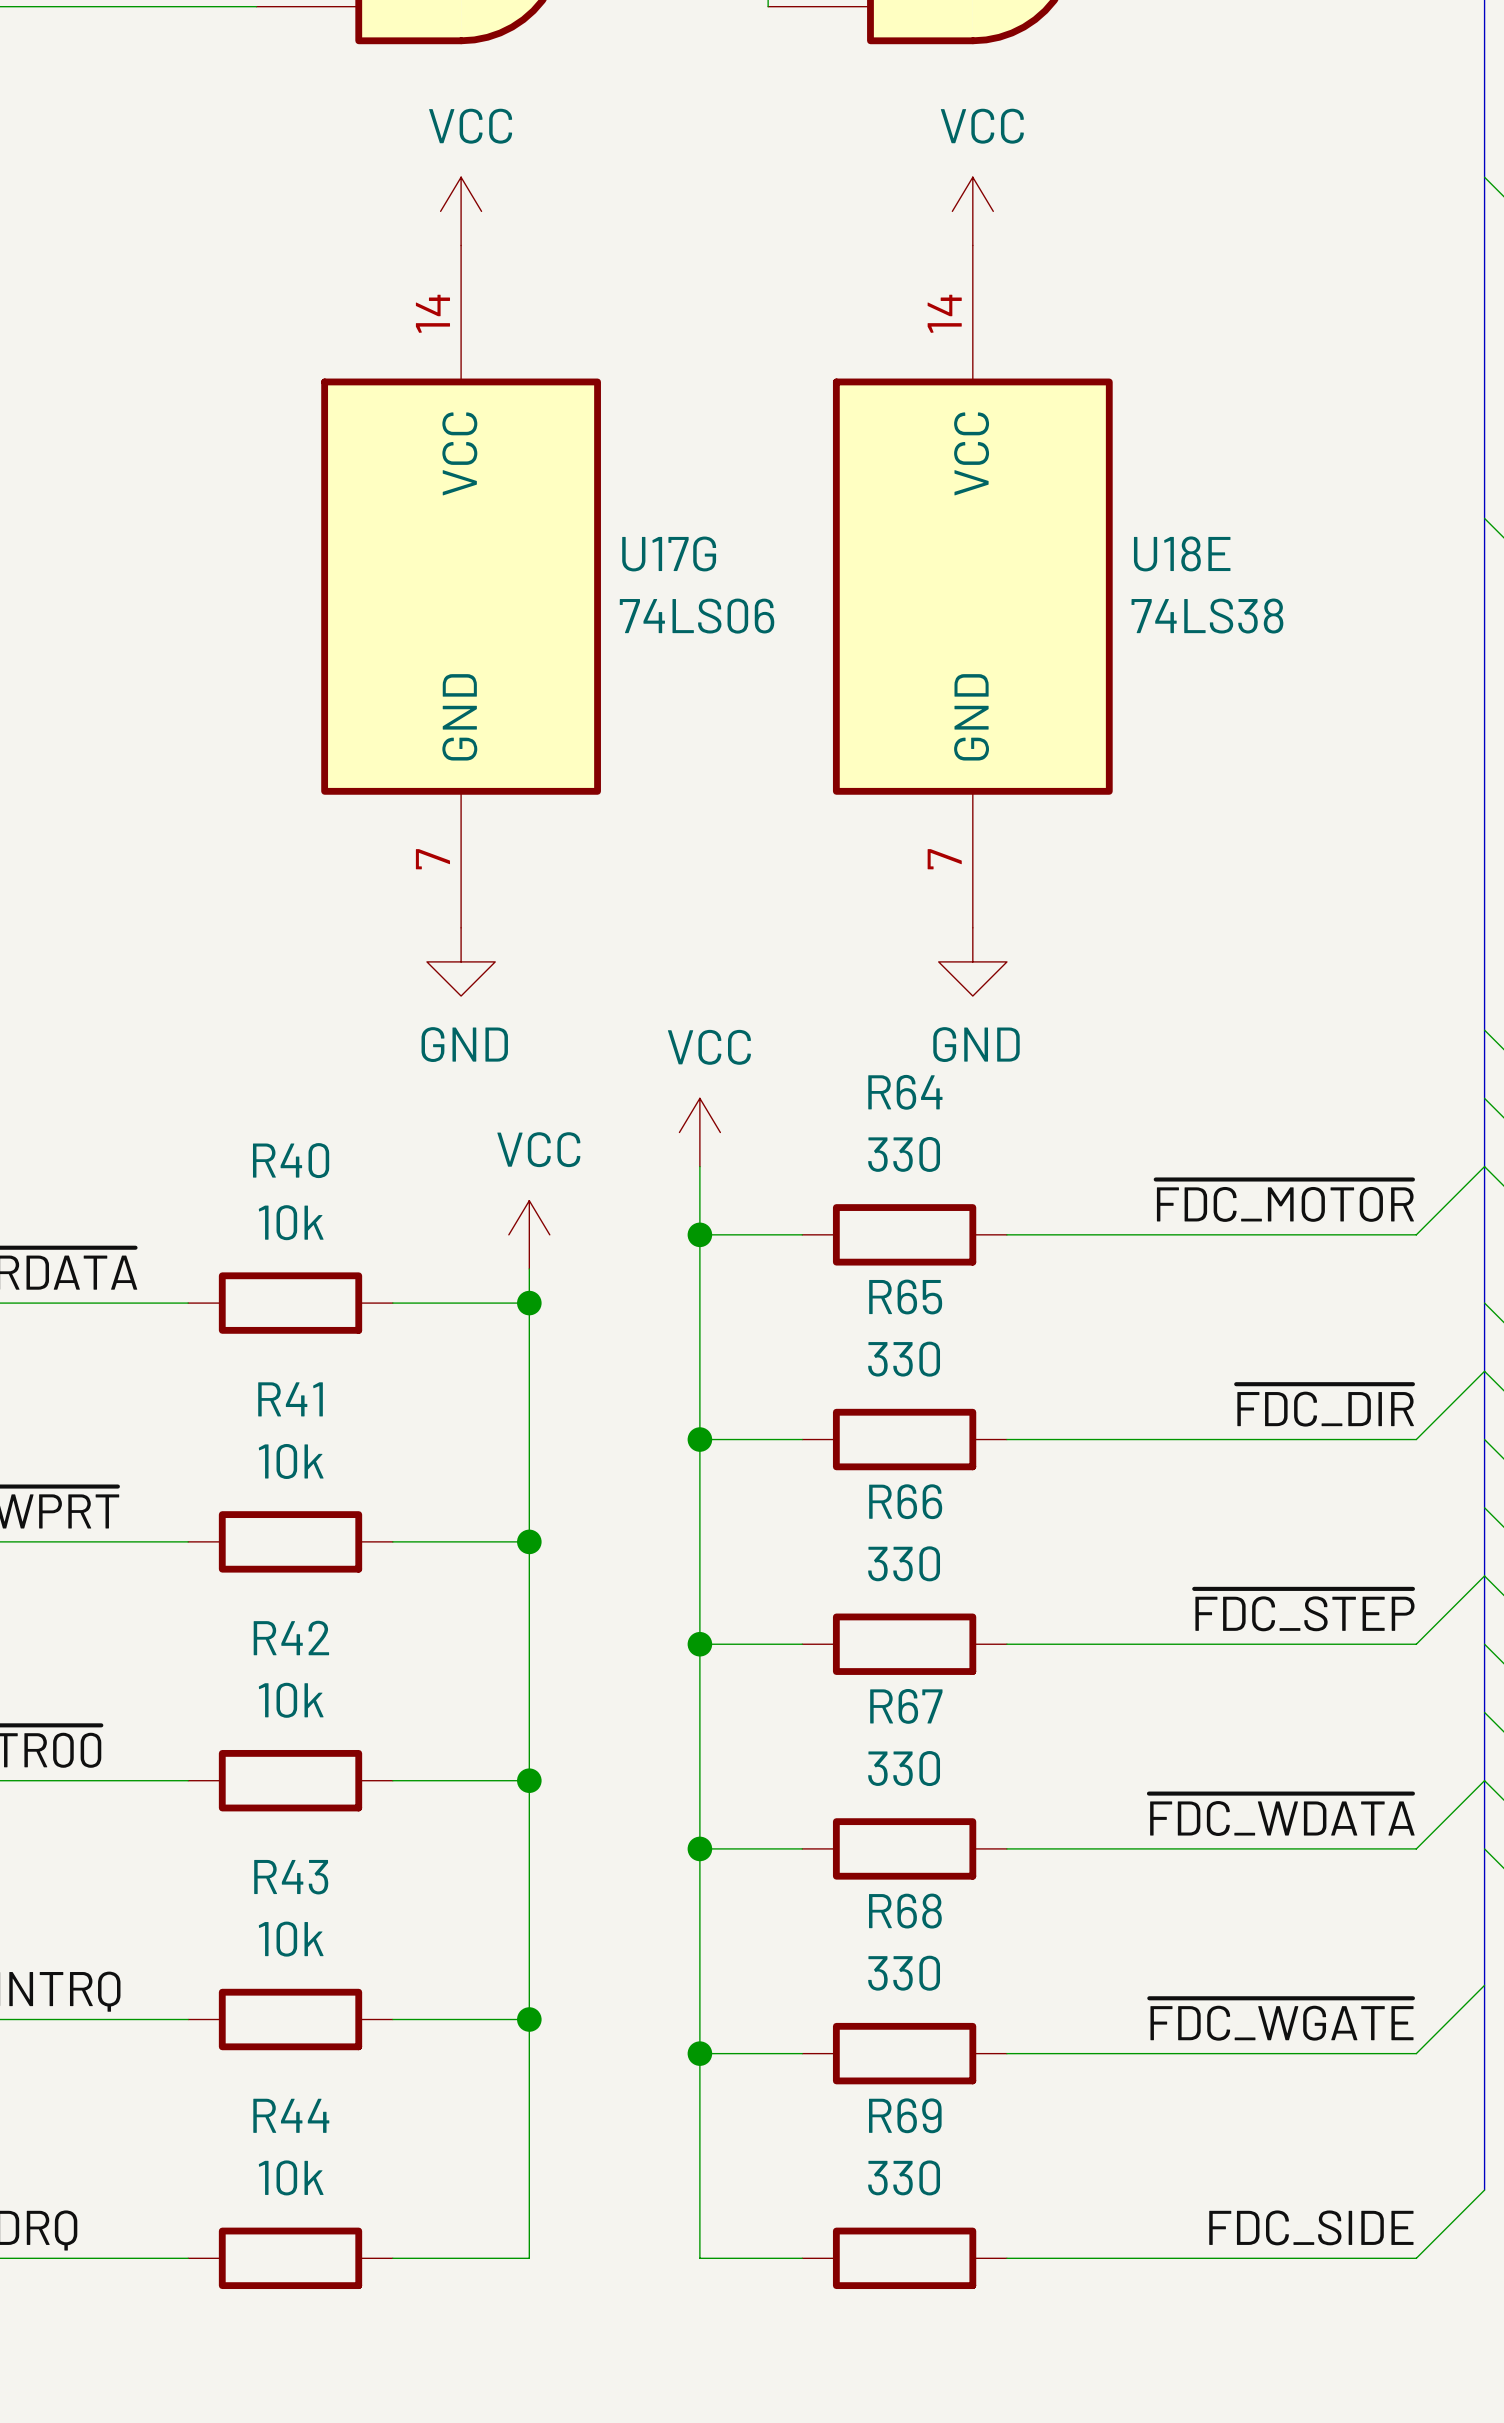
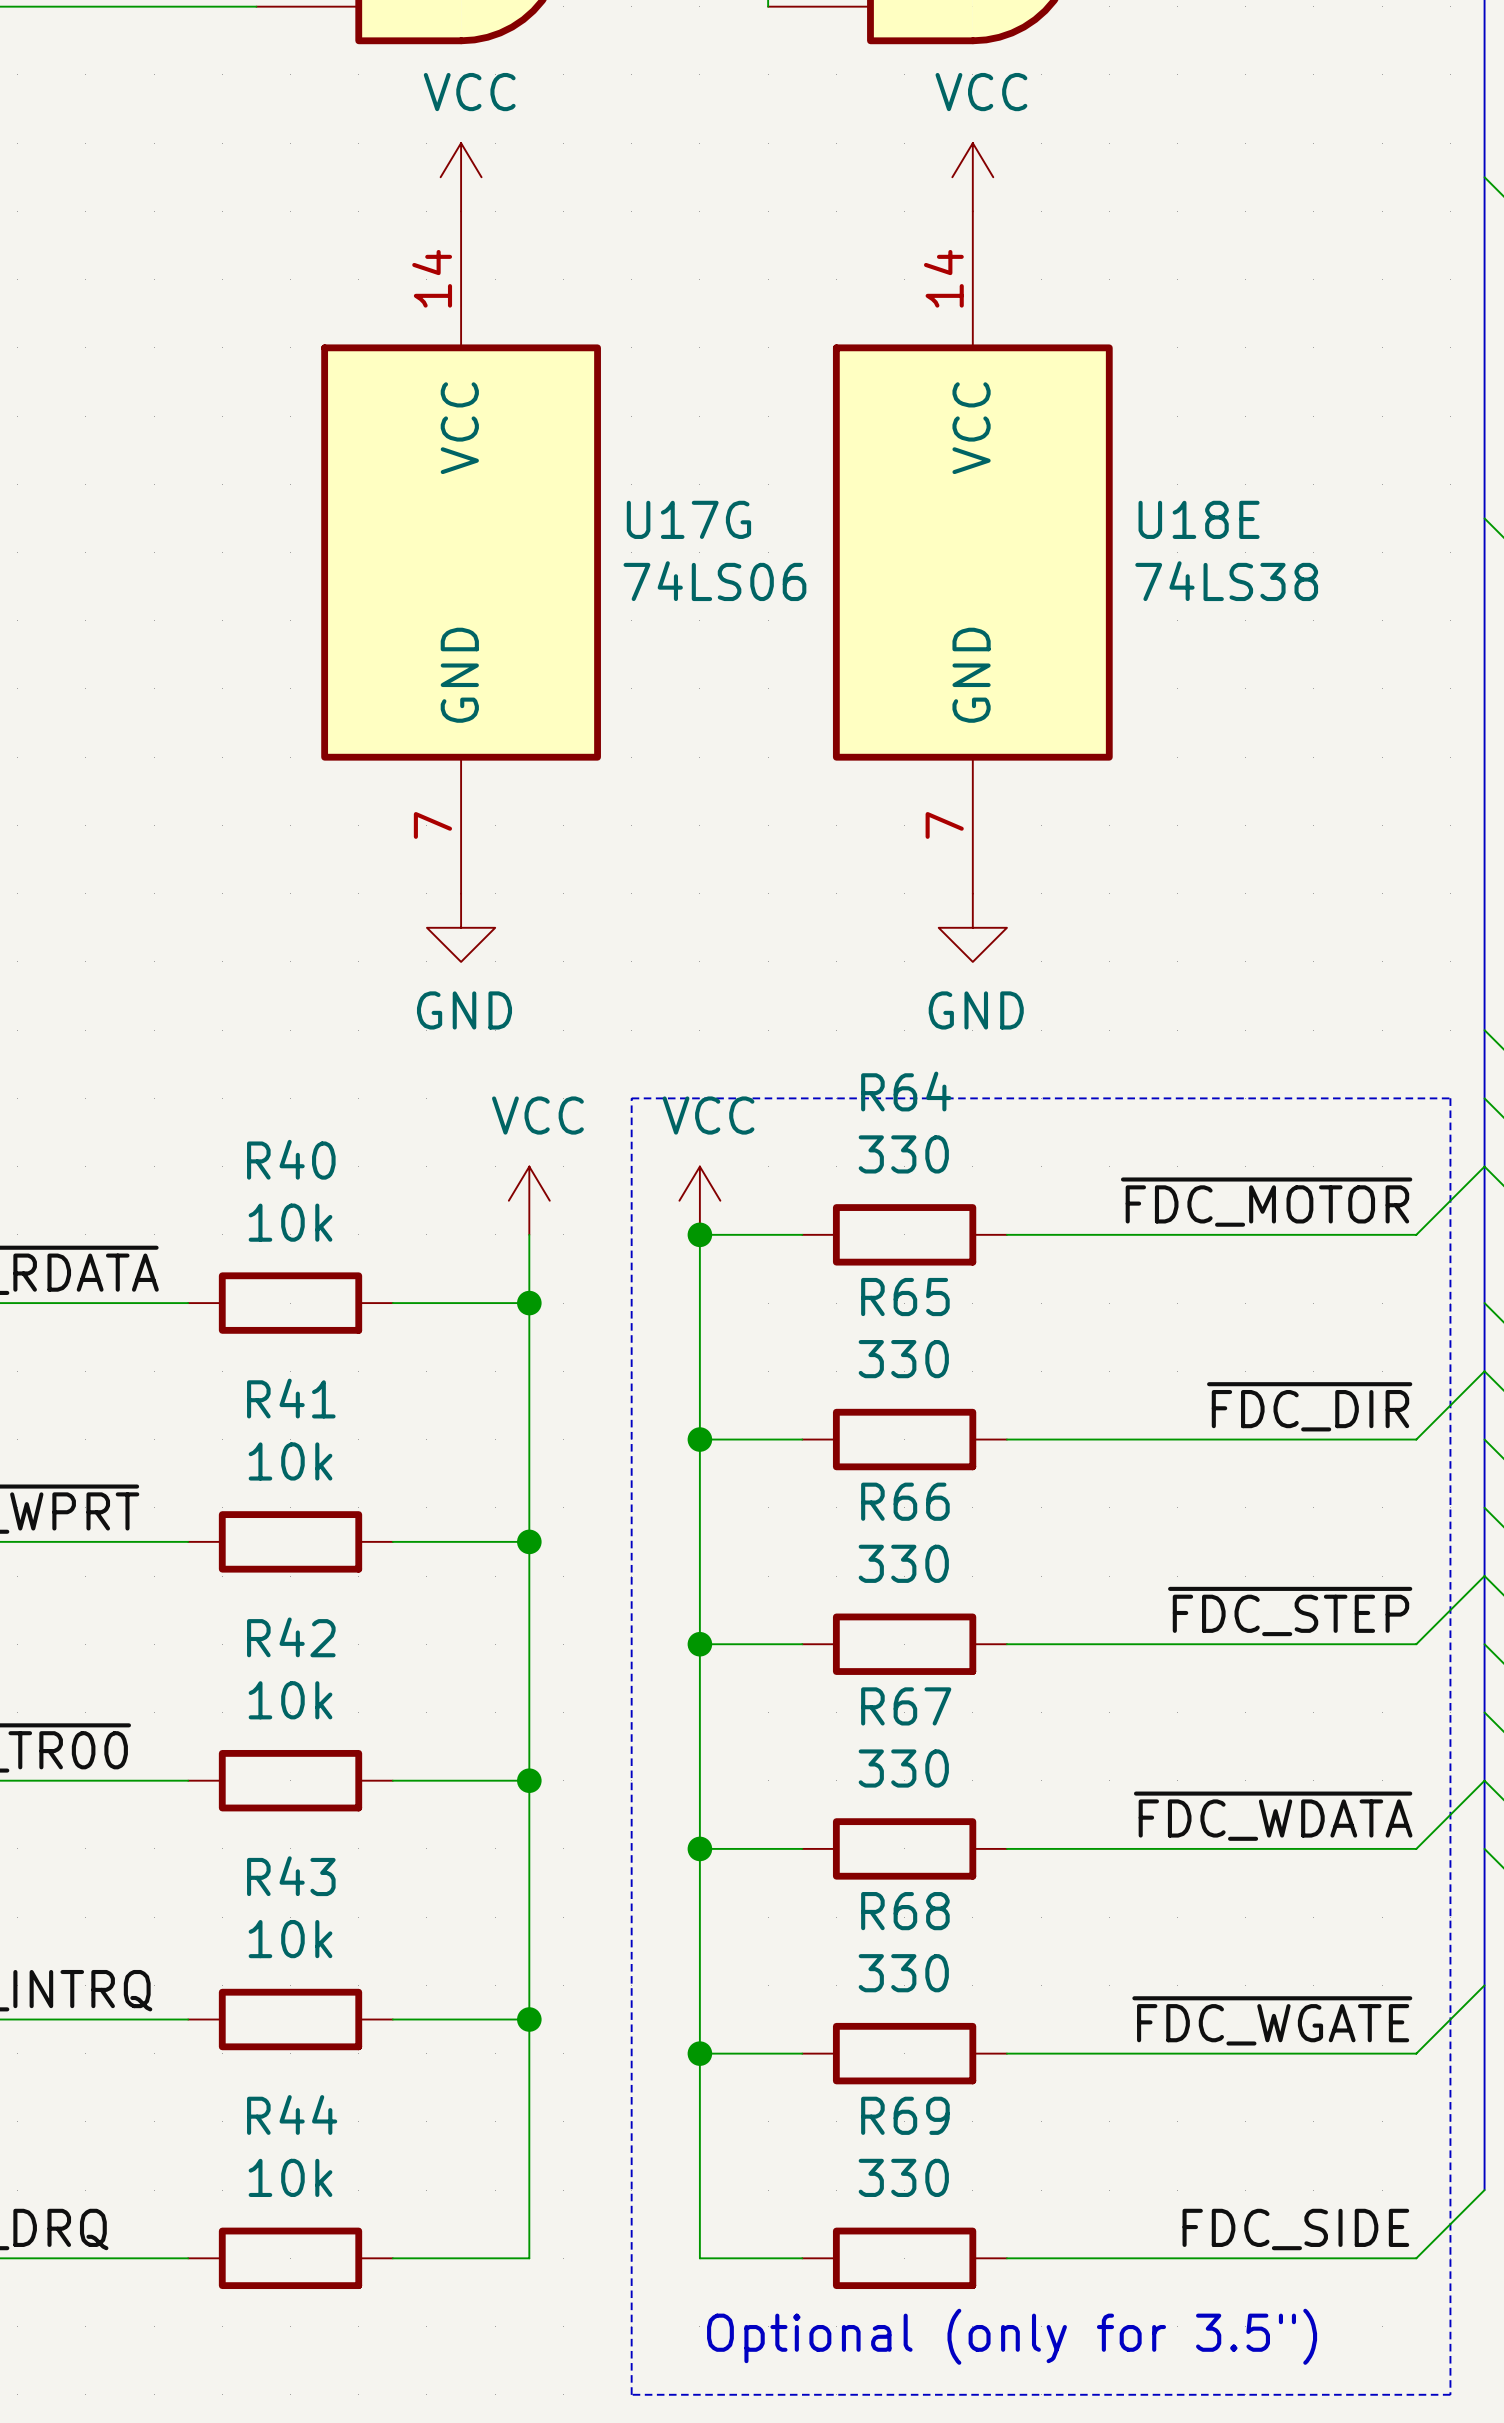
power symbol position: VCC (461, 211) -> VCC (461, 177)
power symbol position: VCC (972, 211) -> VCC (972, 177)
U17G position: (461, 586) -> (461, 552)
U18E position: (972, 586) -> (972, 552)
power symbol position: GND (461, 961) -> GND (461, 927)
power symbol position: GND (972, 961) -> GND (972, 927)
line: none -> (631, 1098) (1450, 1098) (1450, 2394) (631, 2394) (631, 1098)
power symbol position: VCC (699, 1132) -> VCC (699, 1200)
power symbol position: VCC (529, 1234) -> VCC (529, 1200)
text: none -> Optional (only for 3.5") (1012, 2336)

